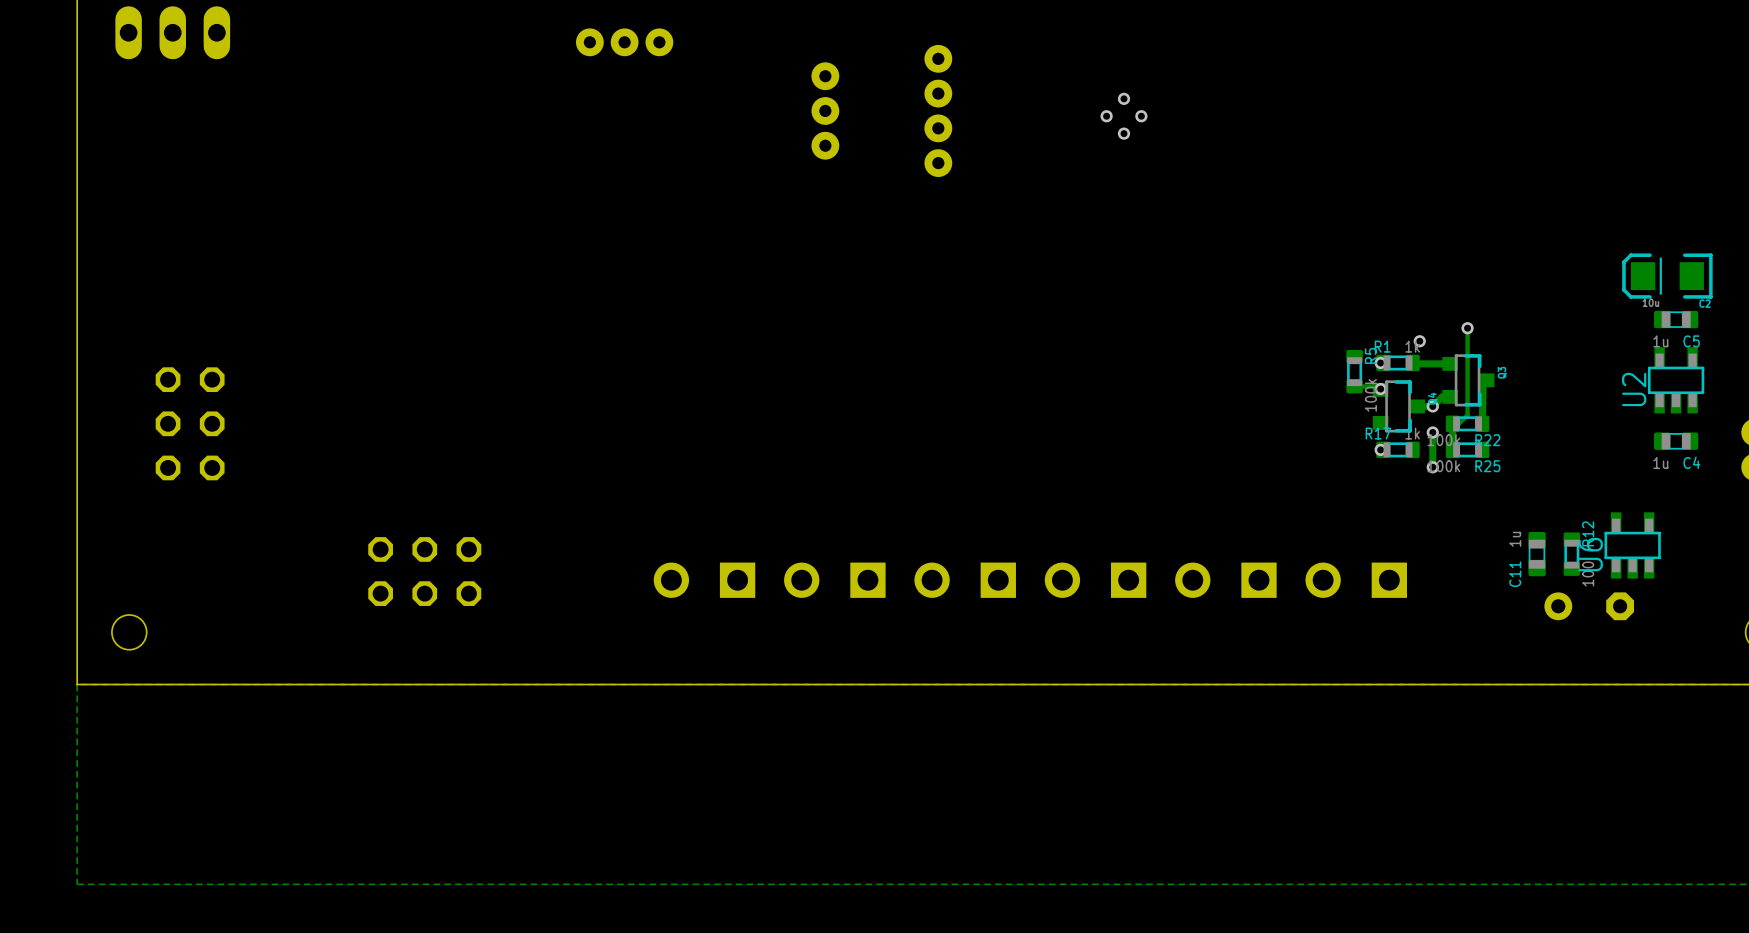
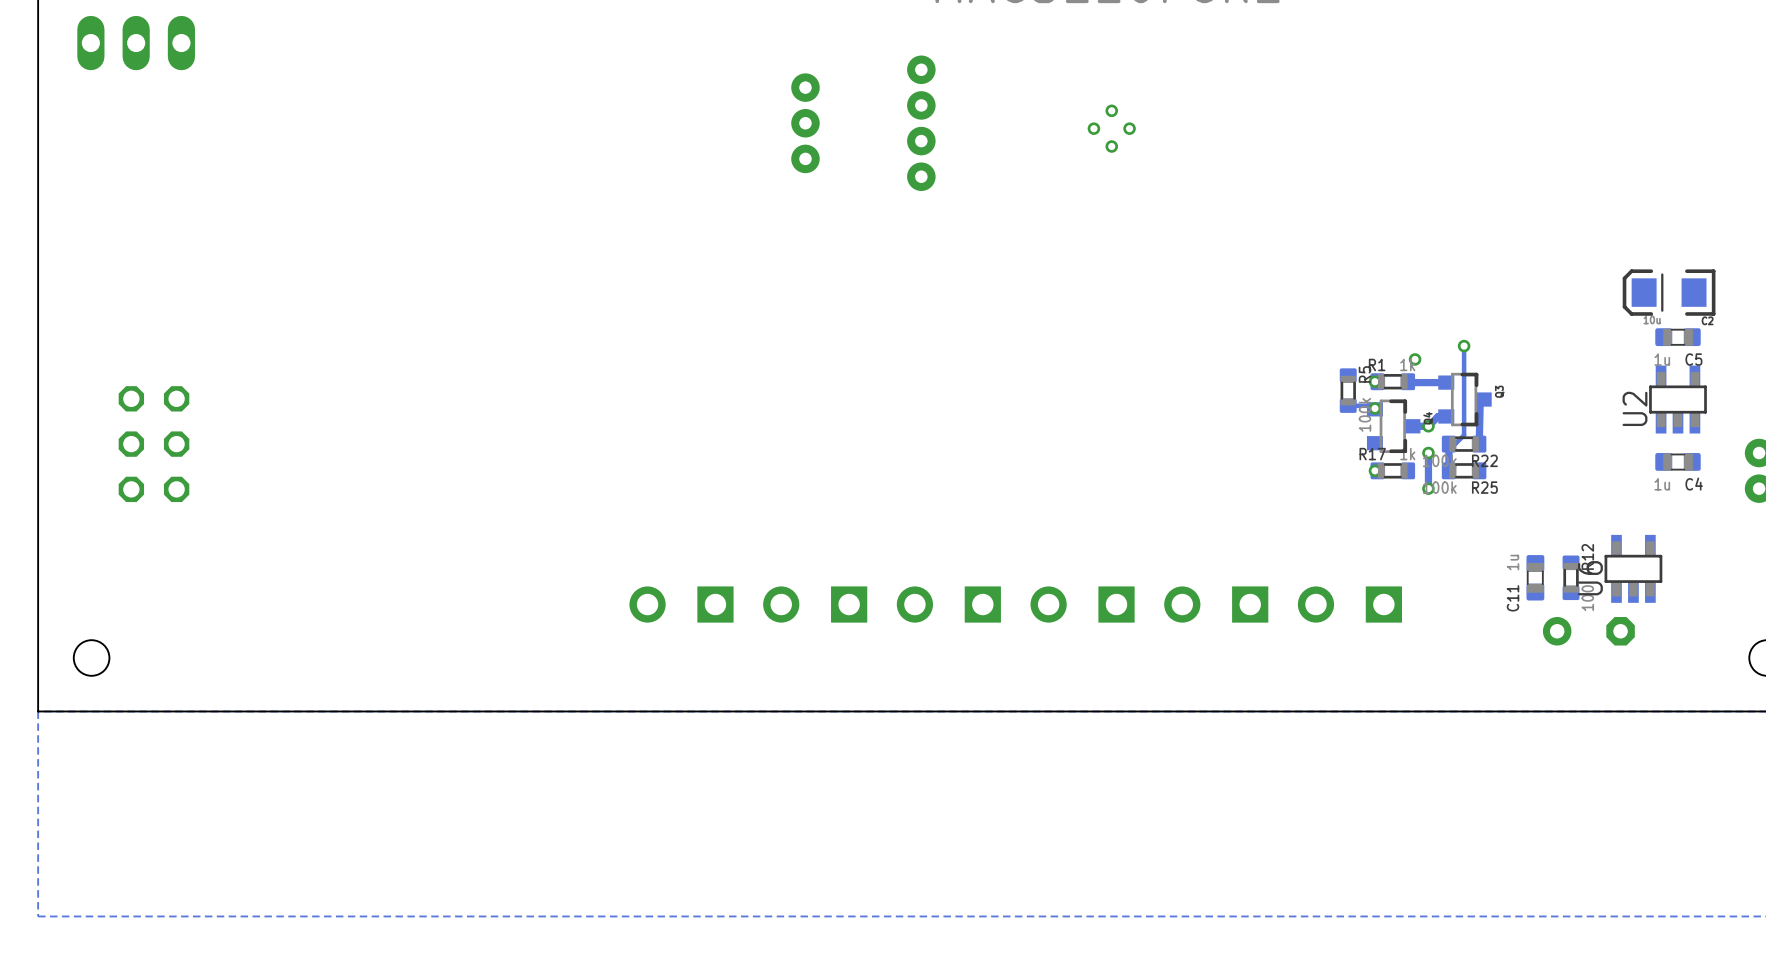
part: (624, 42) -> none
part: (424, 571) -> none

